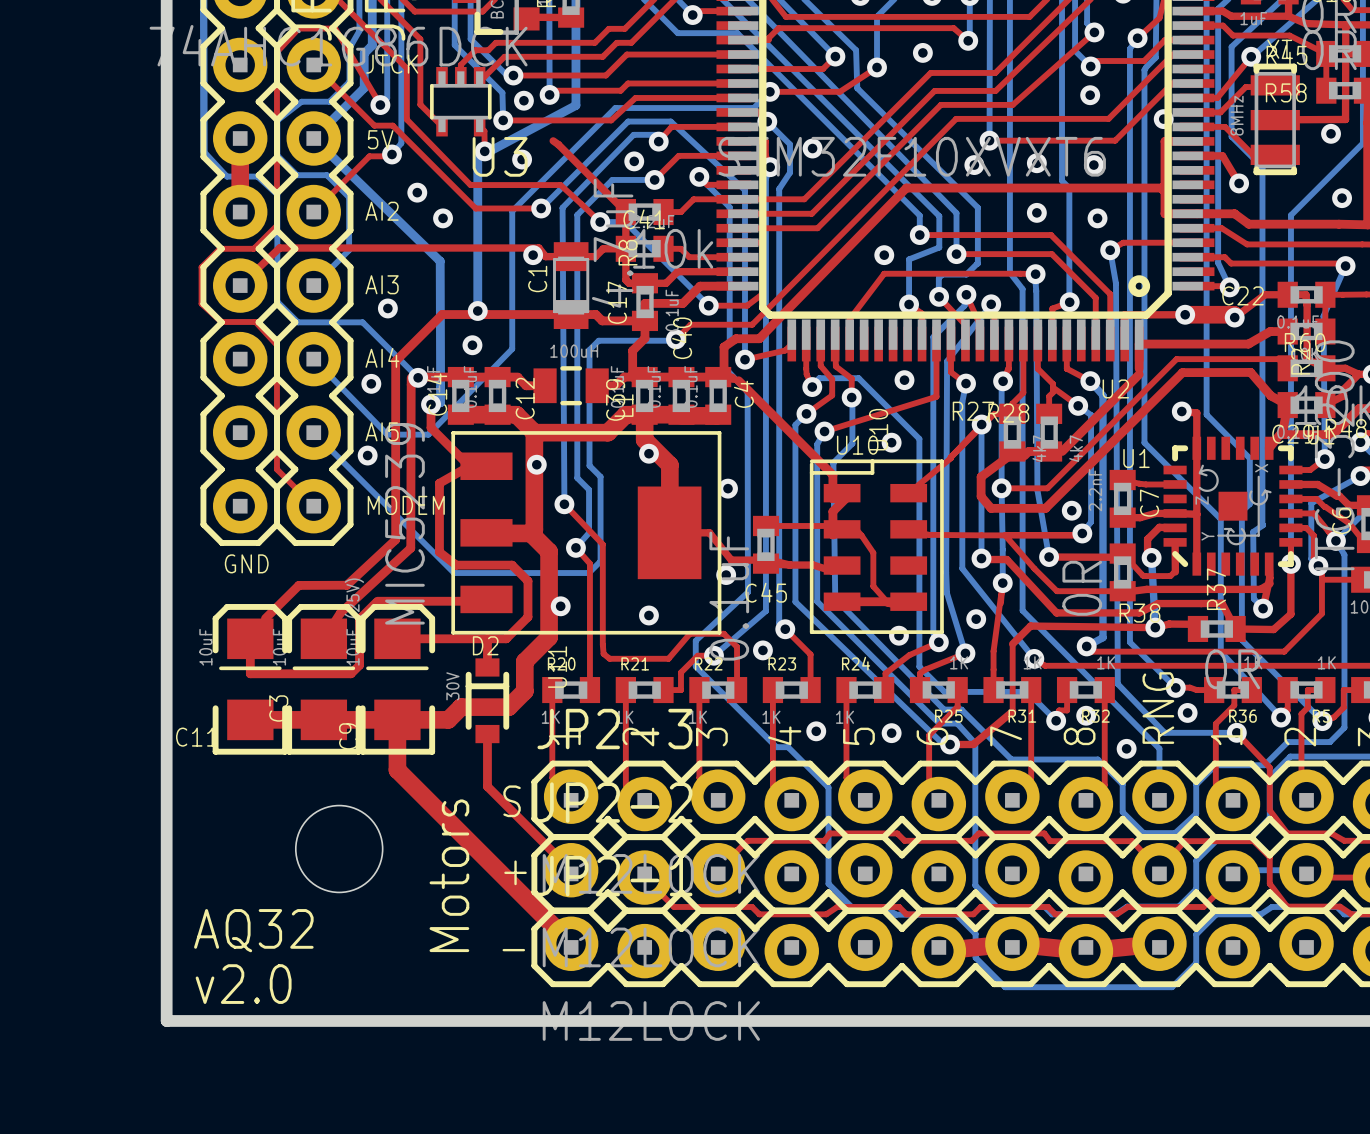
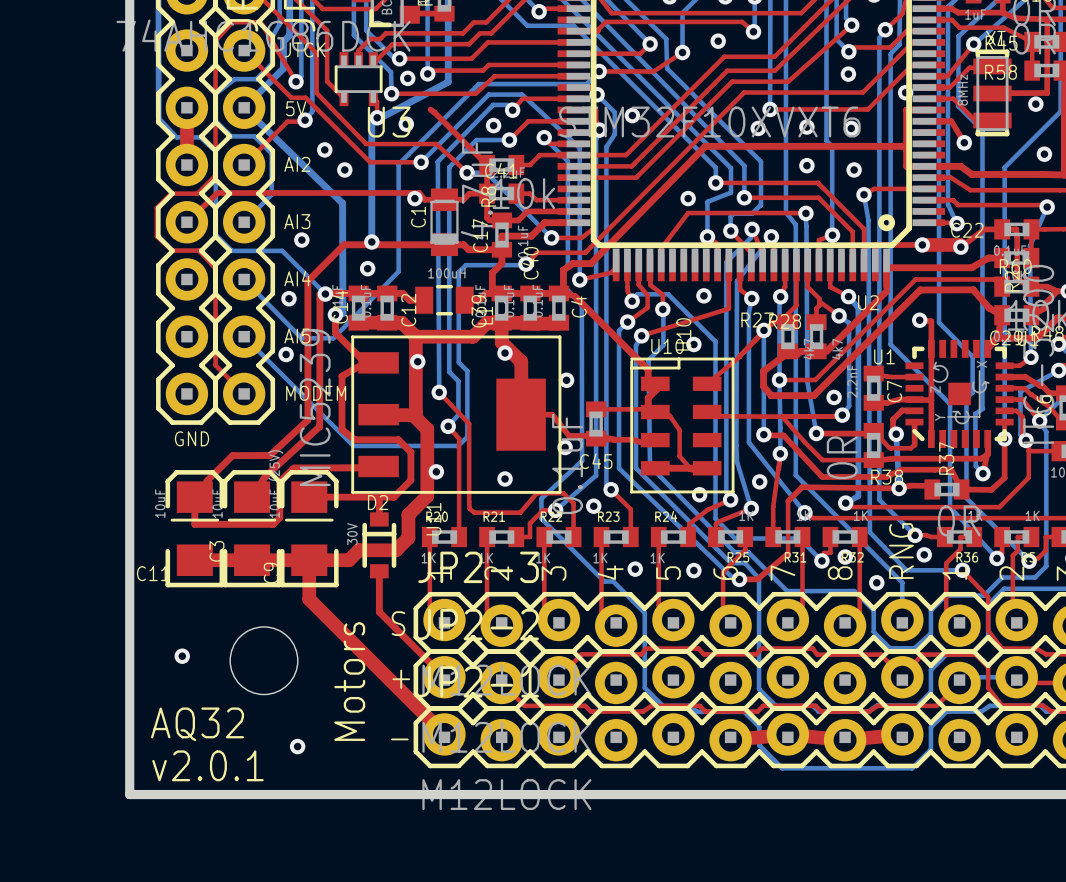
via: none -> (182, 656)
via: none -> (297, 746)
text: v2.0 (243, 984) -> v2.0.1 (207, 765)

